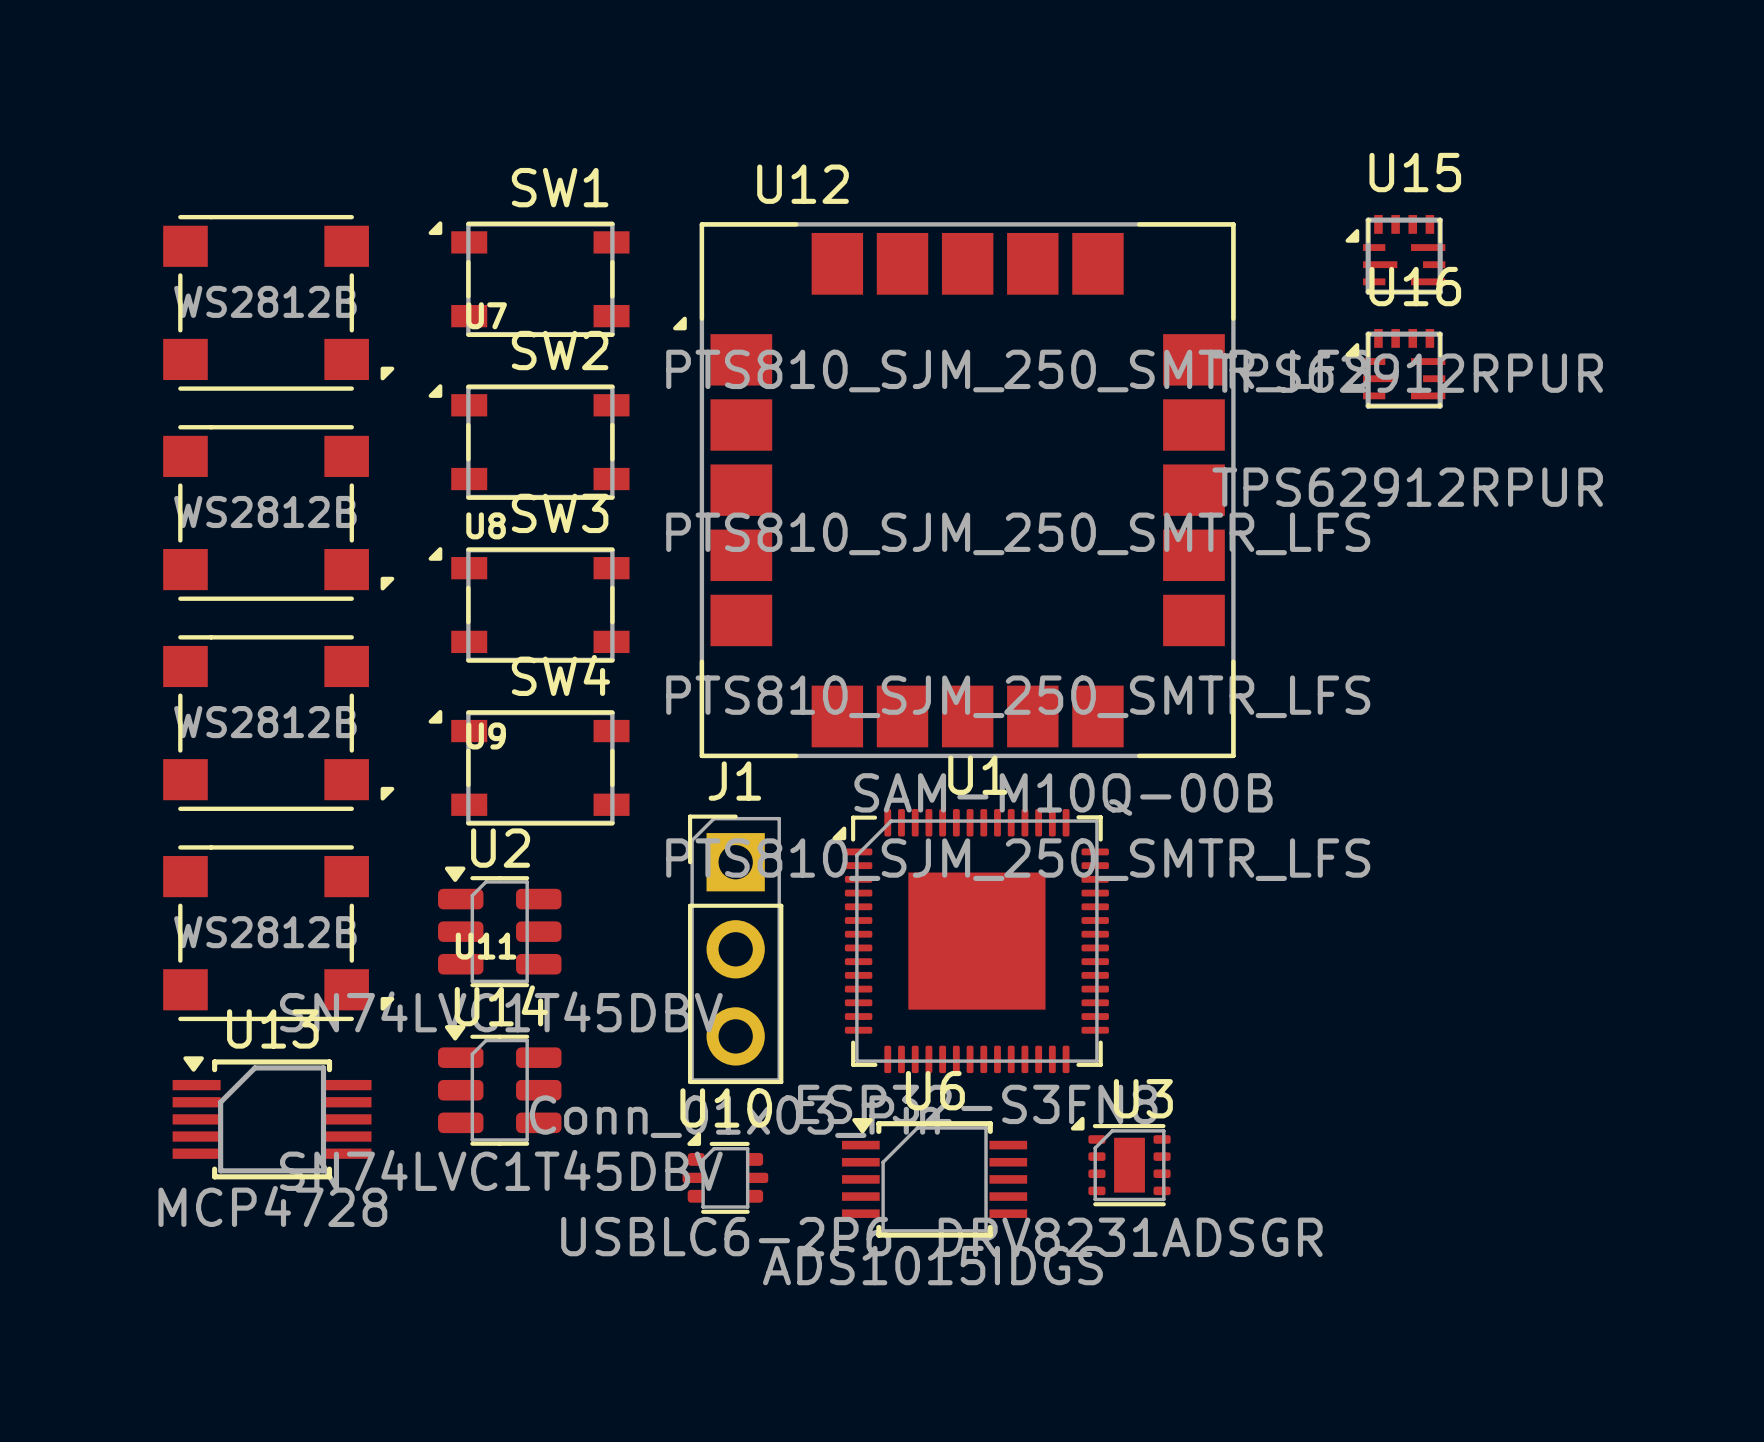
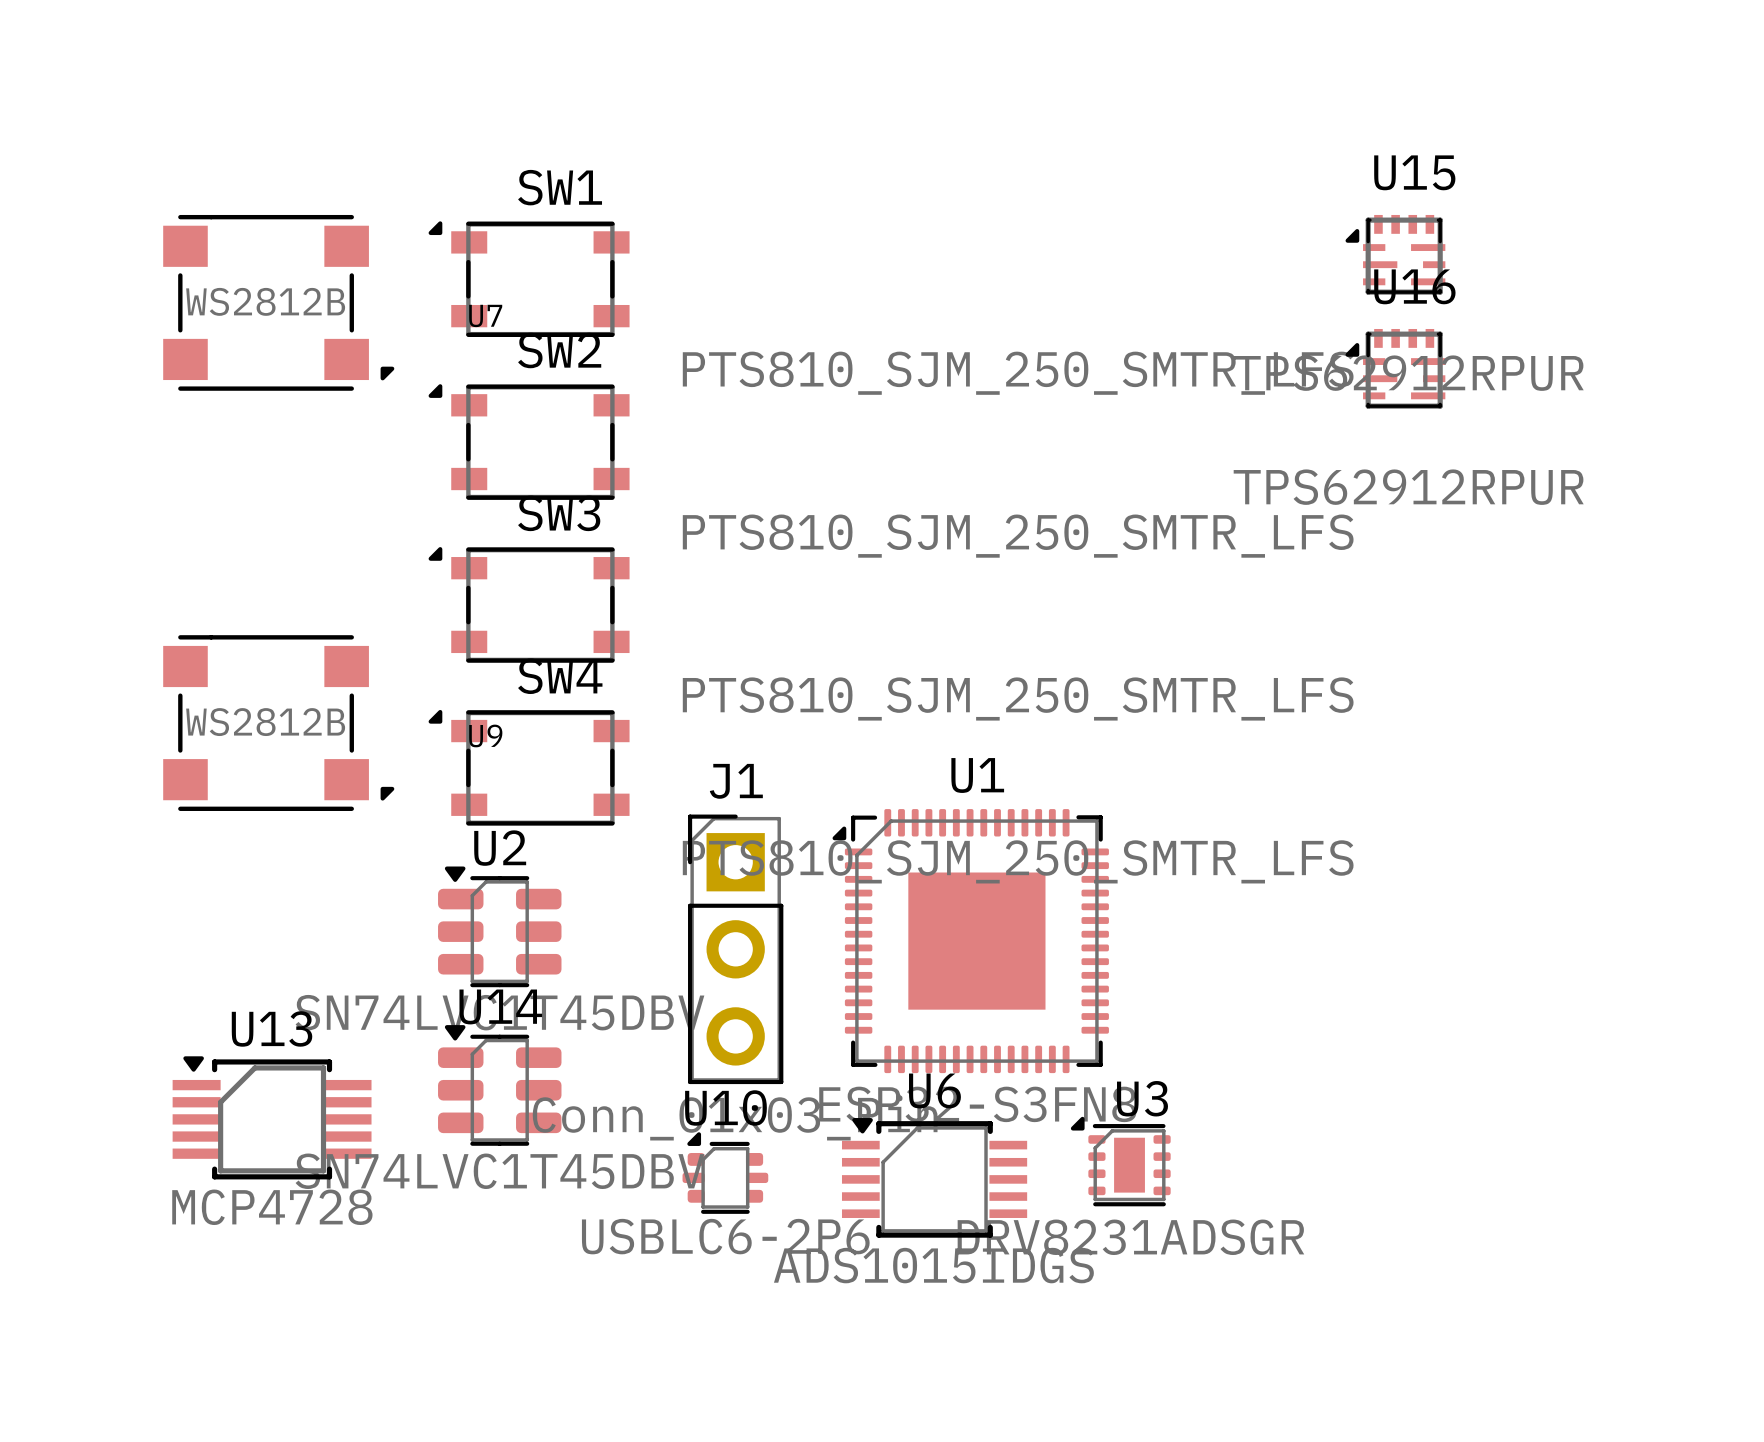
U12: SAM-M10Q-00B (954, 490) -> none
U8: WS2812B (278, 512) -> none
U11: WS2812B (278, 933) -> none

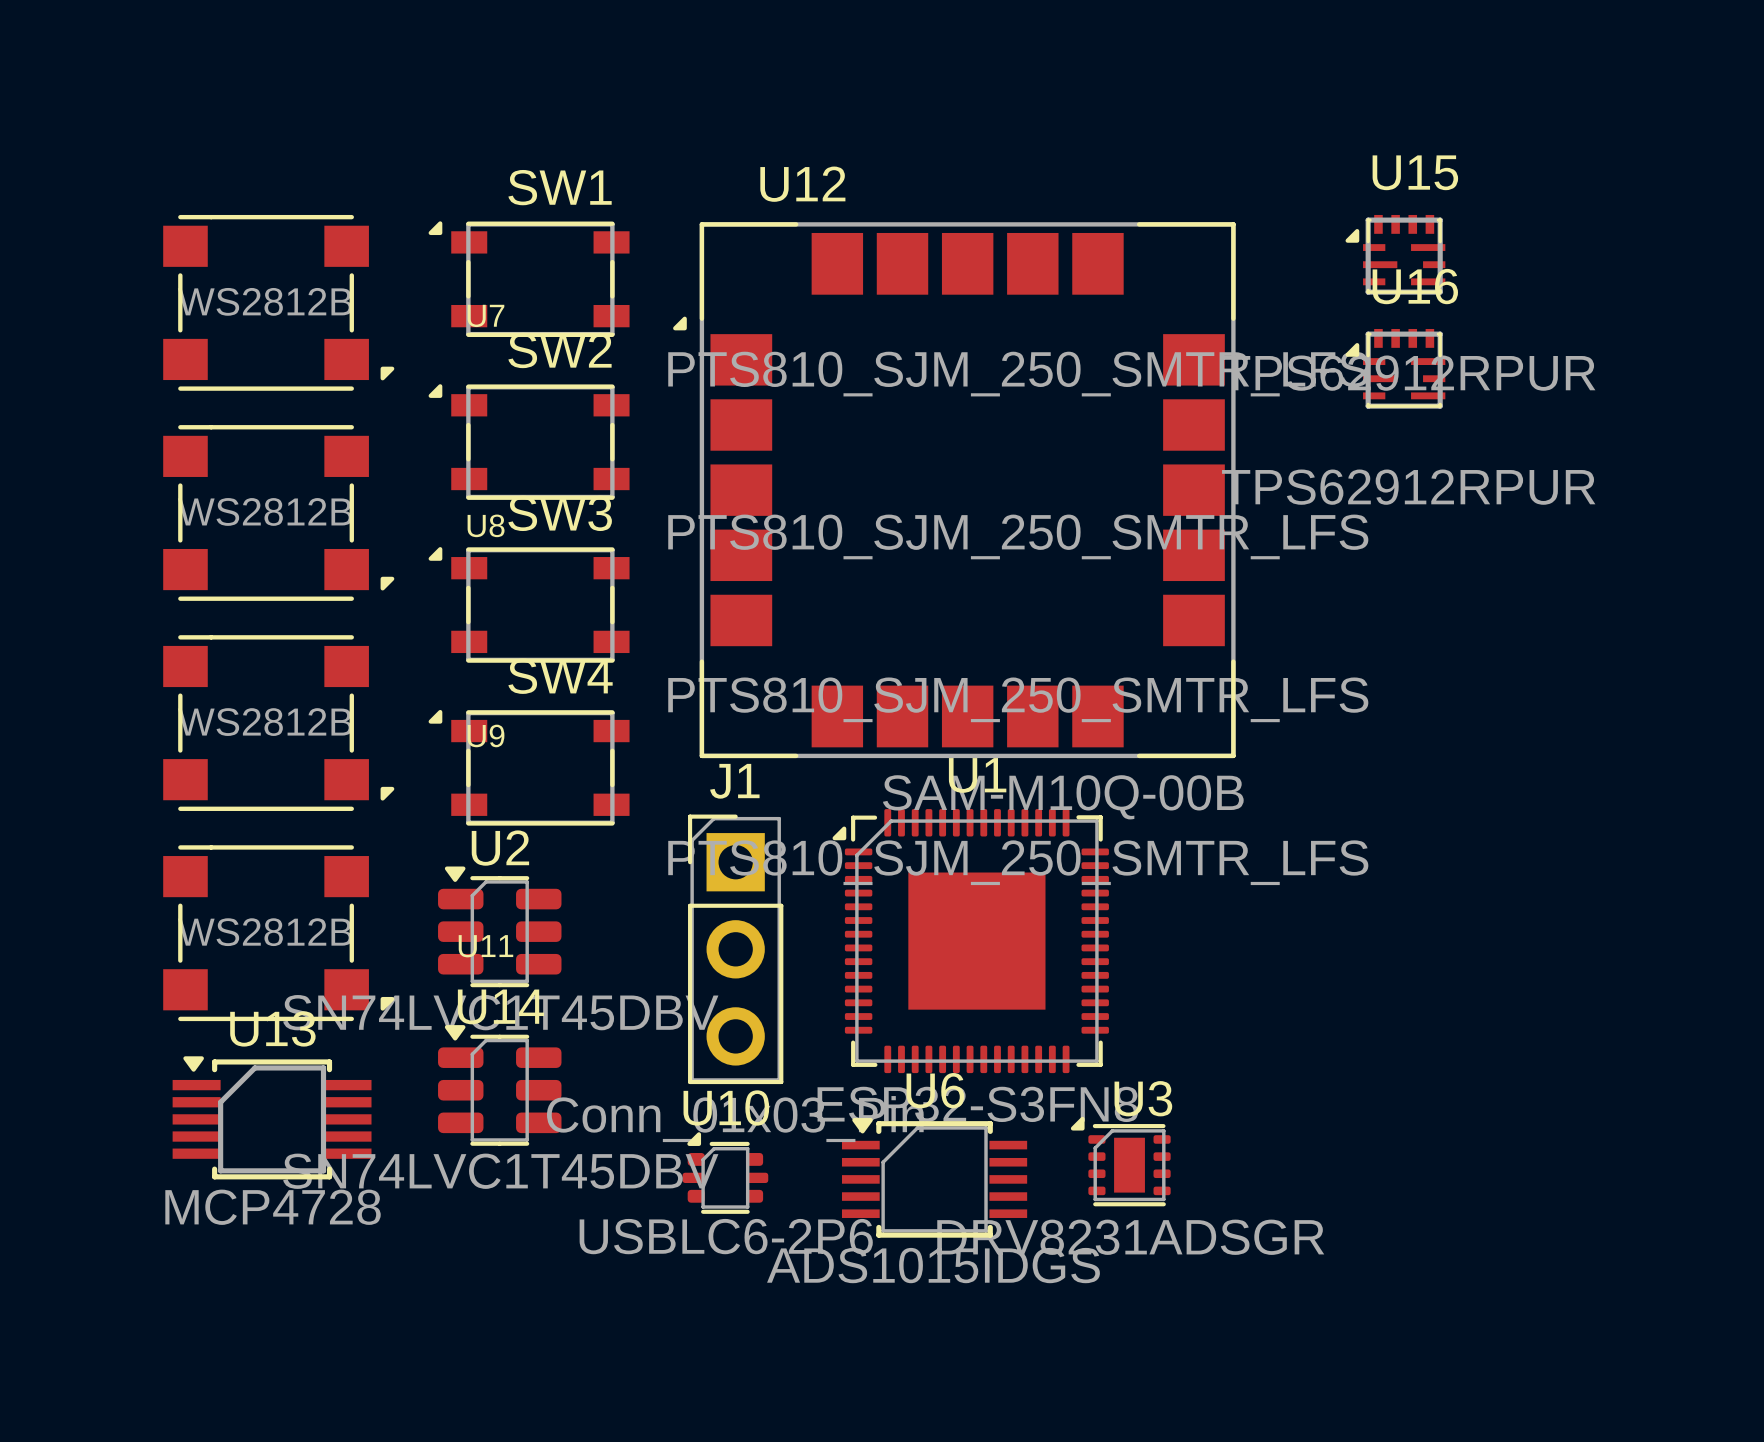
U12: none -> SAM-M10Q-00B (954, 490)
U8: none -> WS2812B (278, 512)
U11: none -> WS2812B (278, 933)

